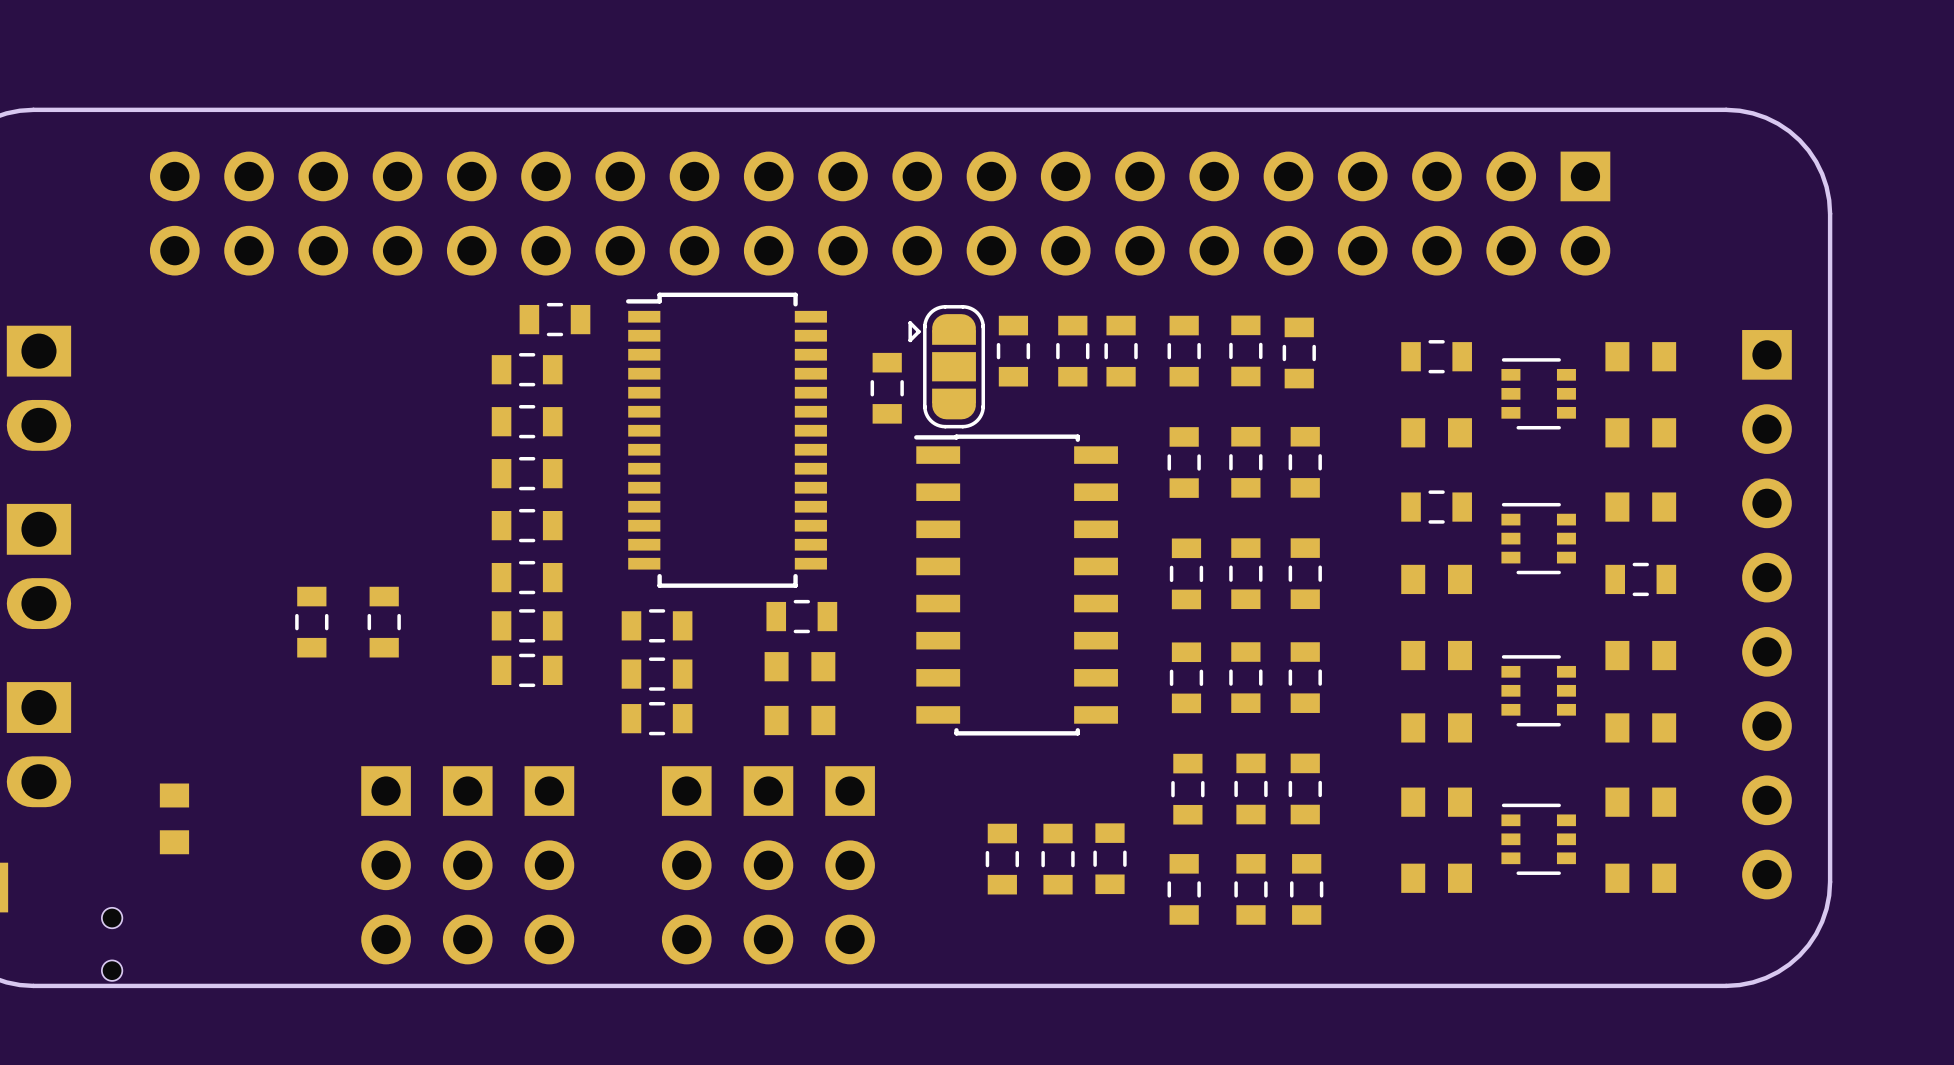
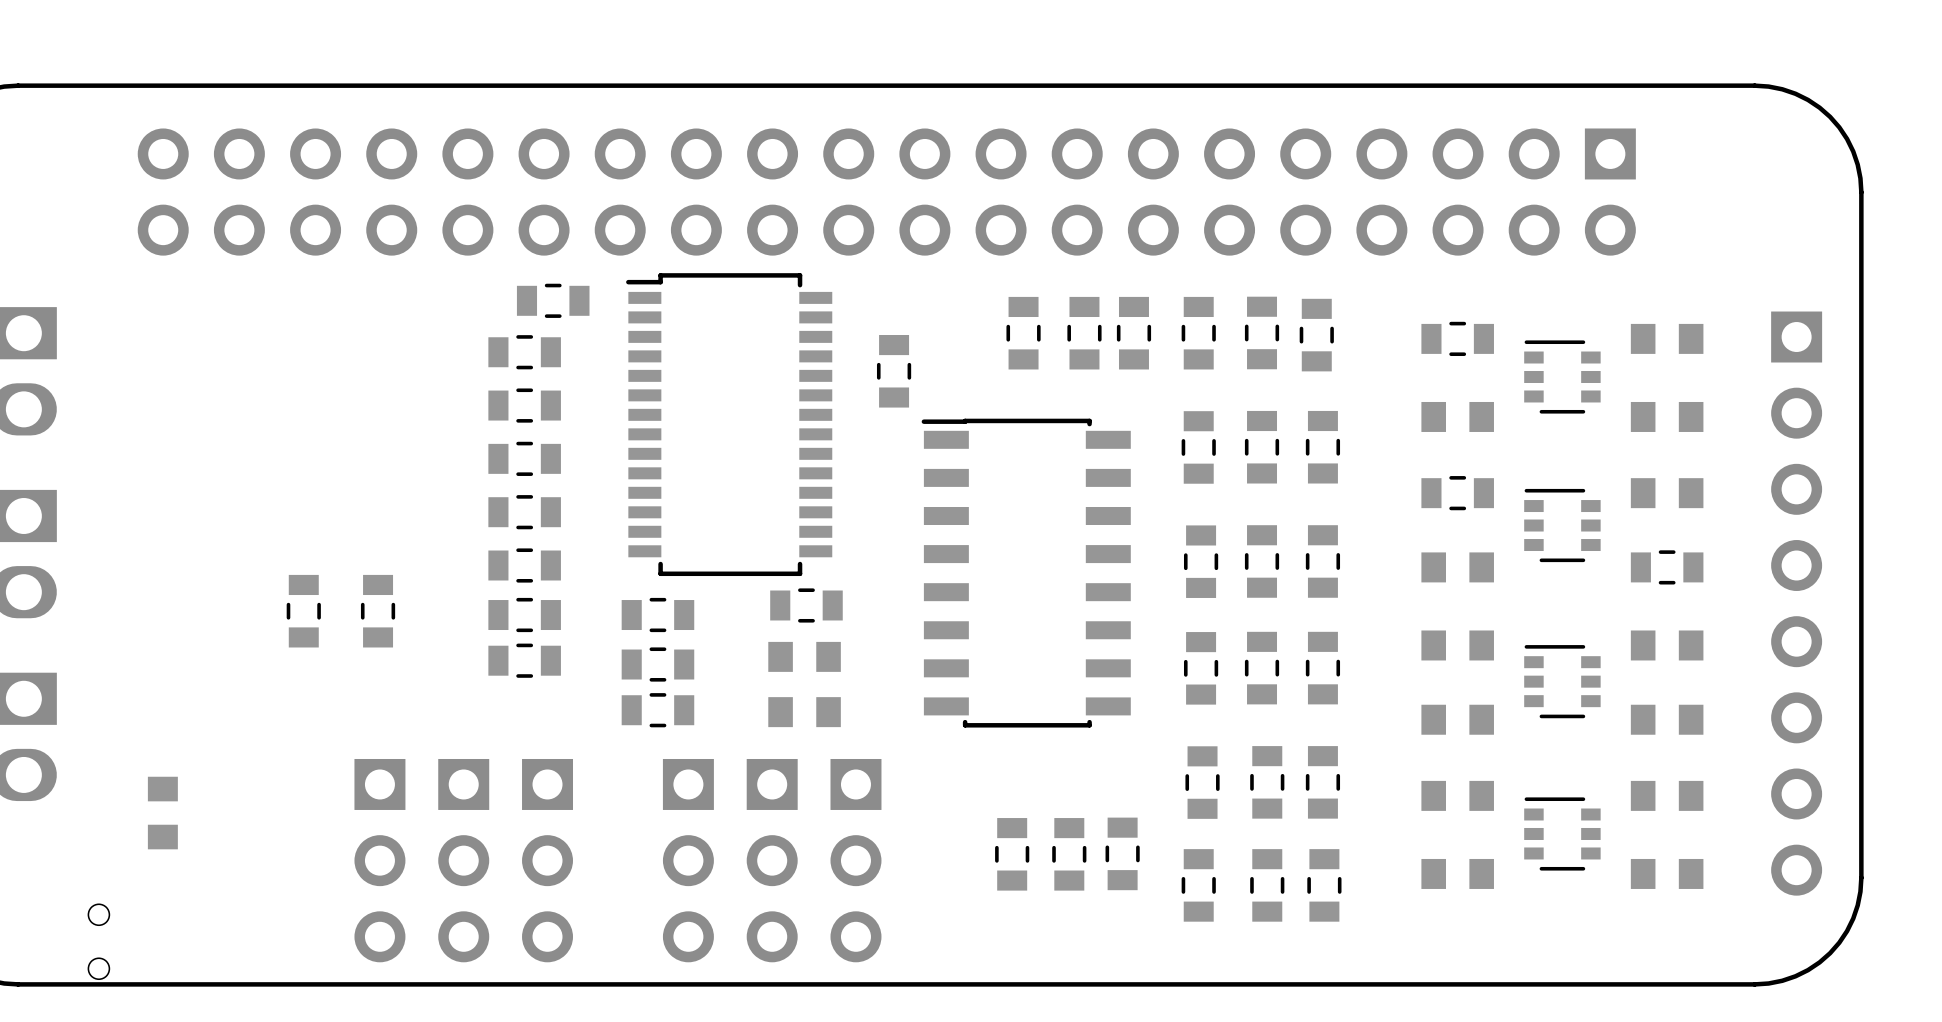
part: (946, 366) -> none

